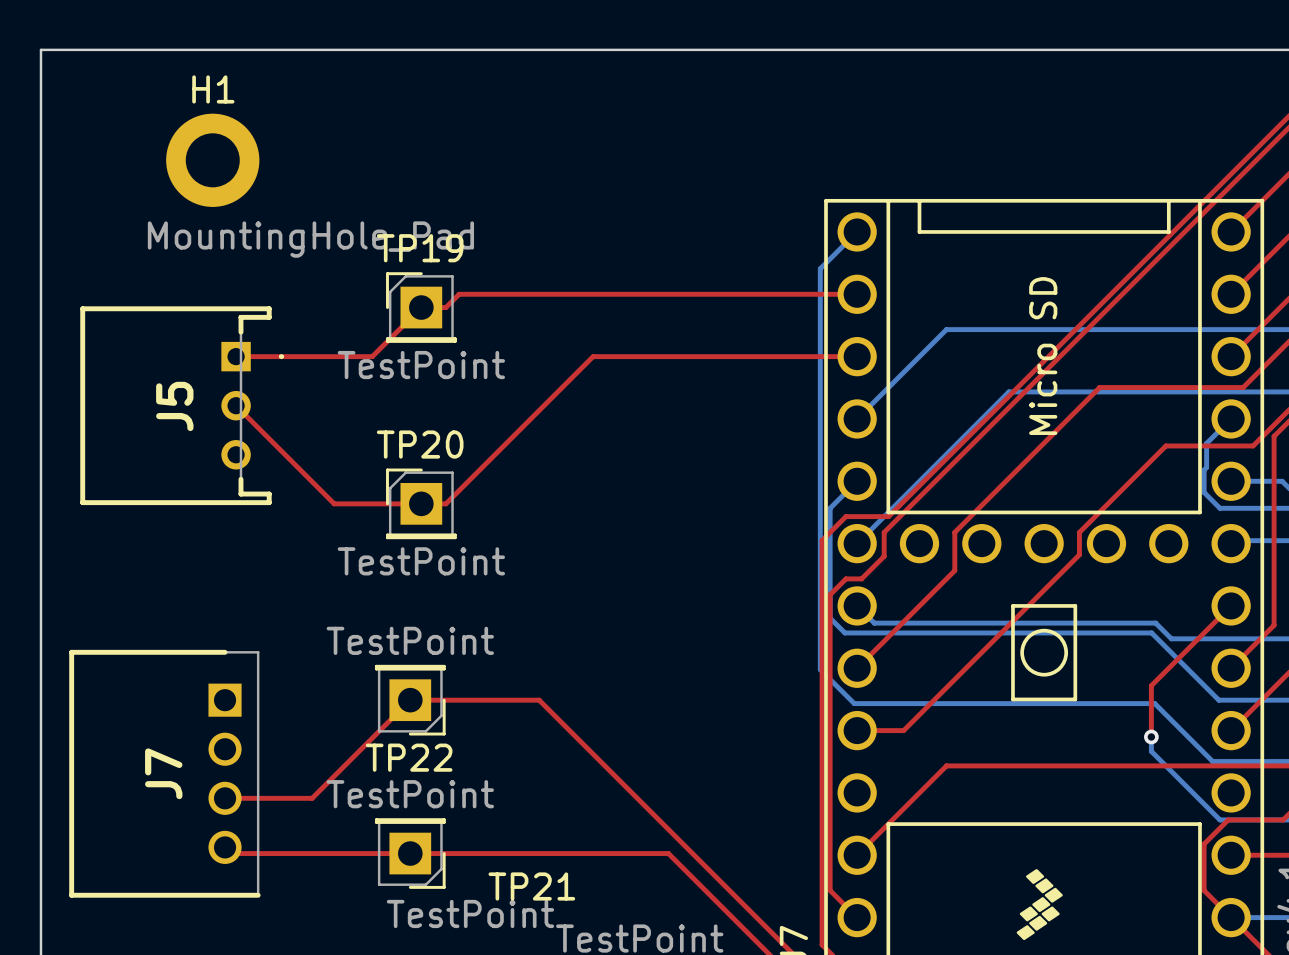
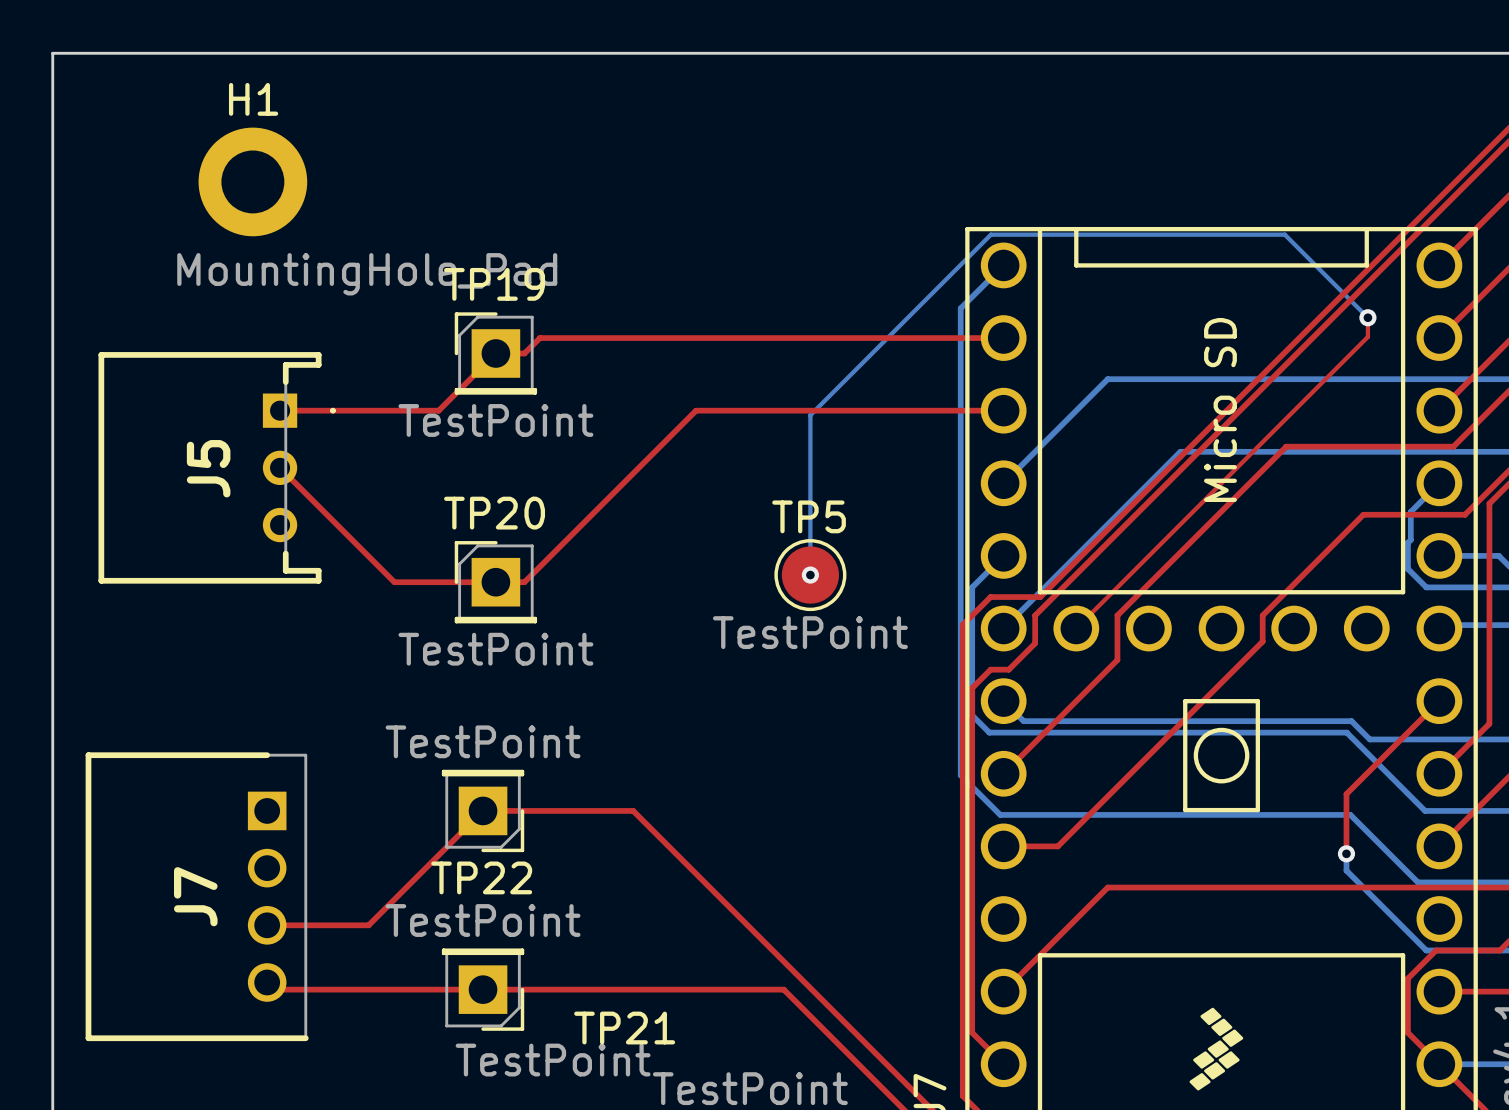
top track: none -> (1367, 317) (1367, 336) (1076, 628) (1076, 623)
bottom track: none -> (1367, 317) (1284, 234) (990, 234) (810, 415) (810, 575)
via: none -> (1367, 317)
TP5: none -> TestPoint (810, 575)
via: none -> (810, 575)

